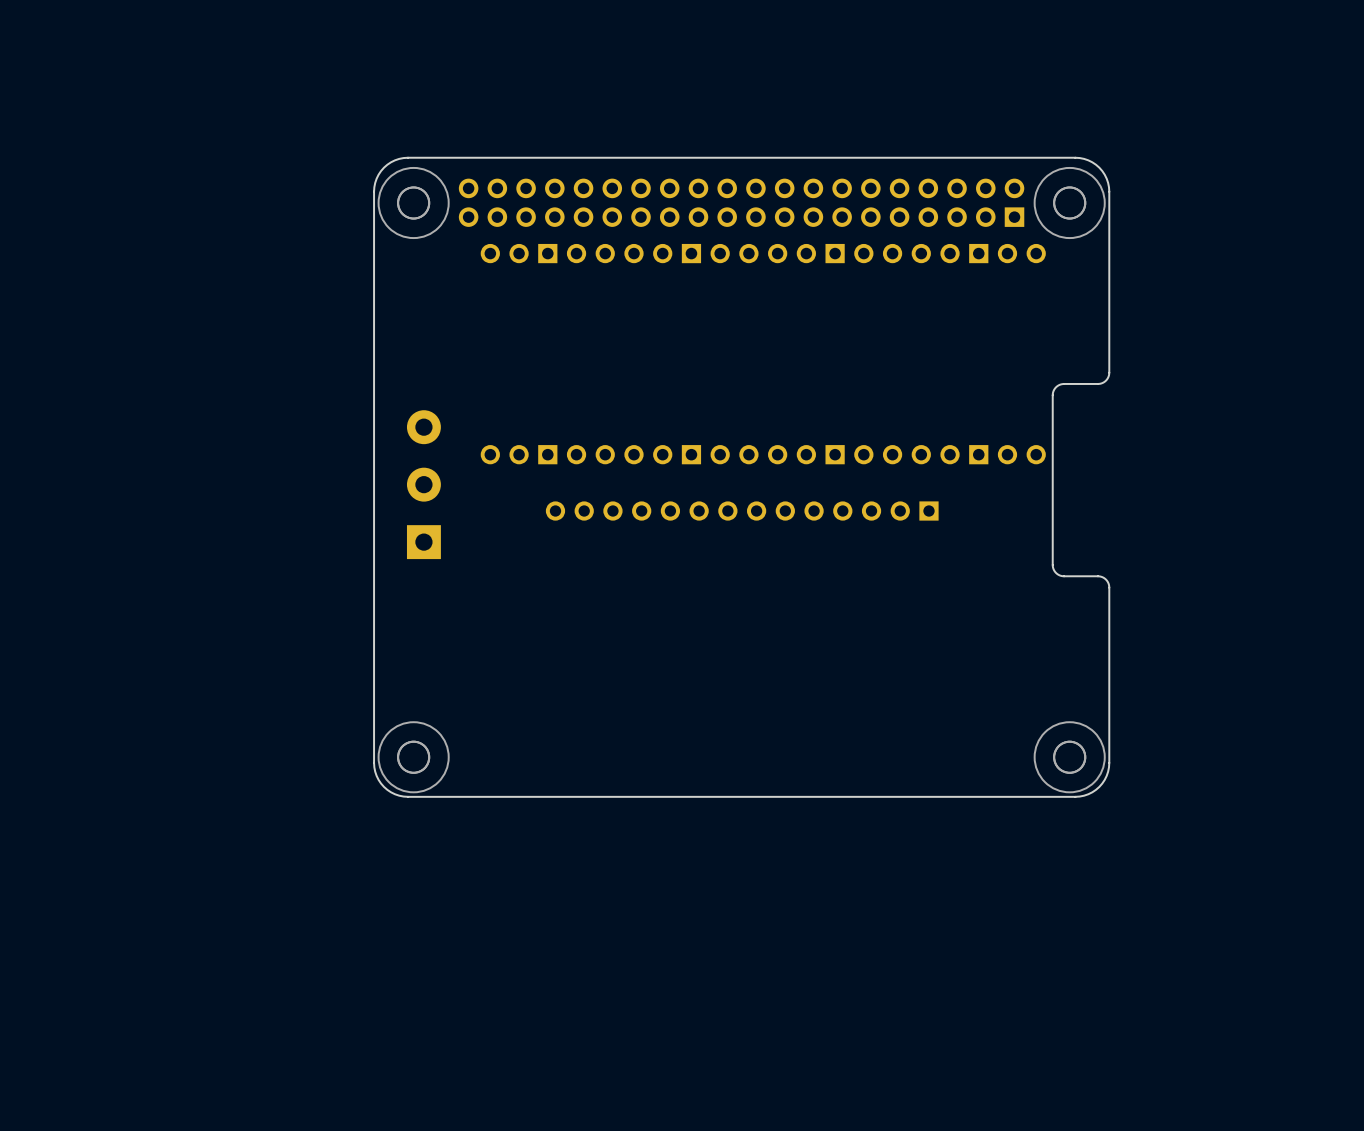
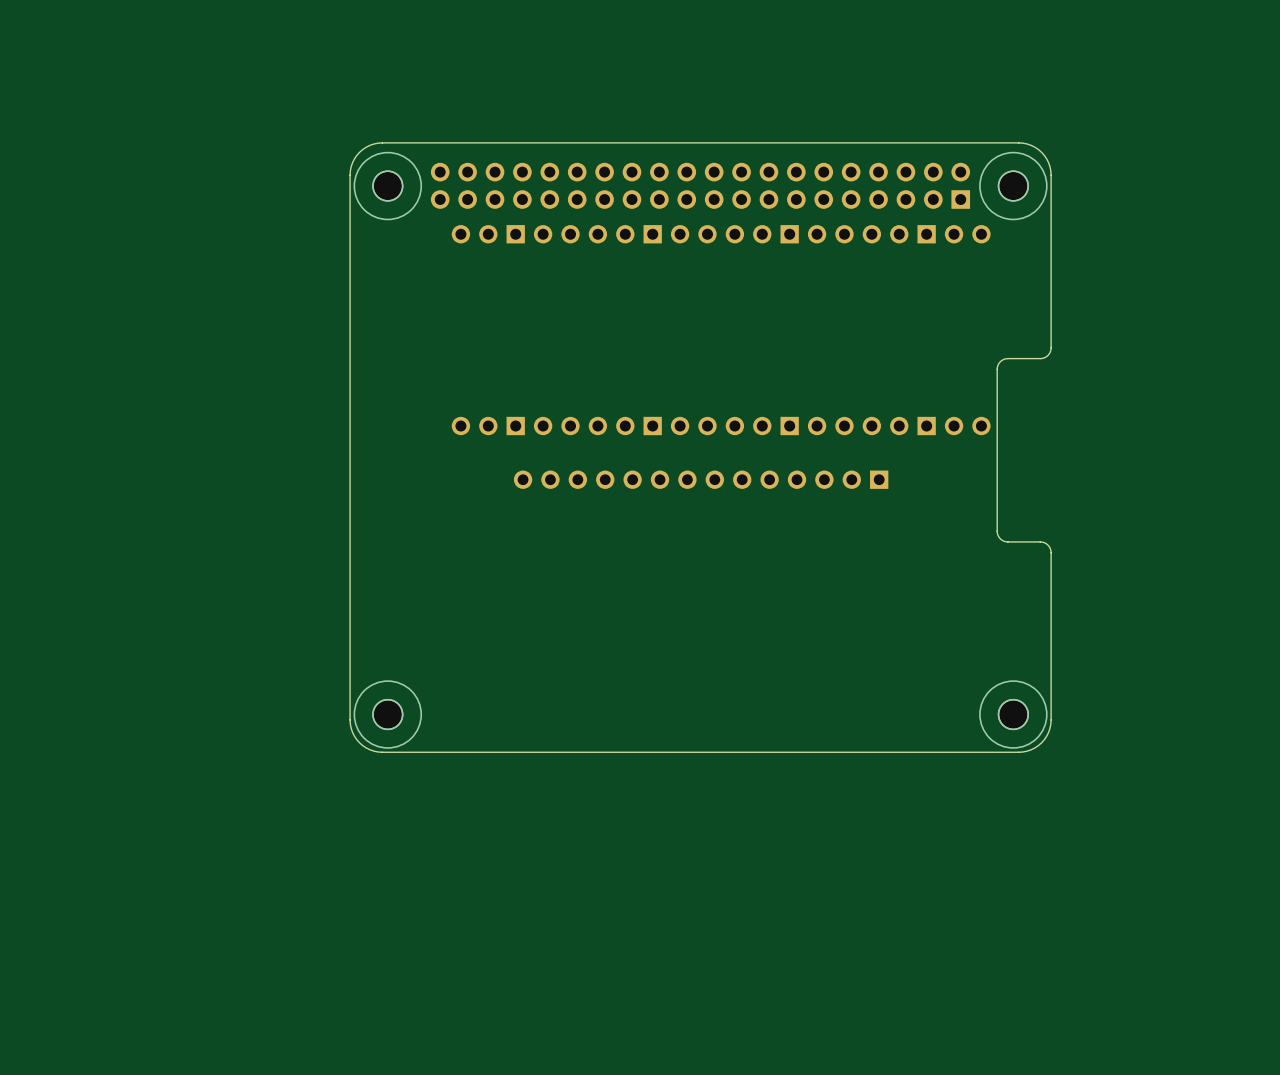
part: (423, 484) -> none

